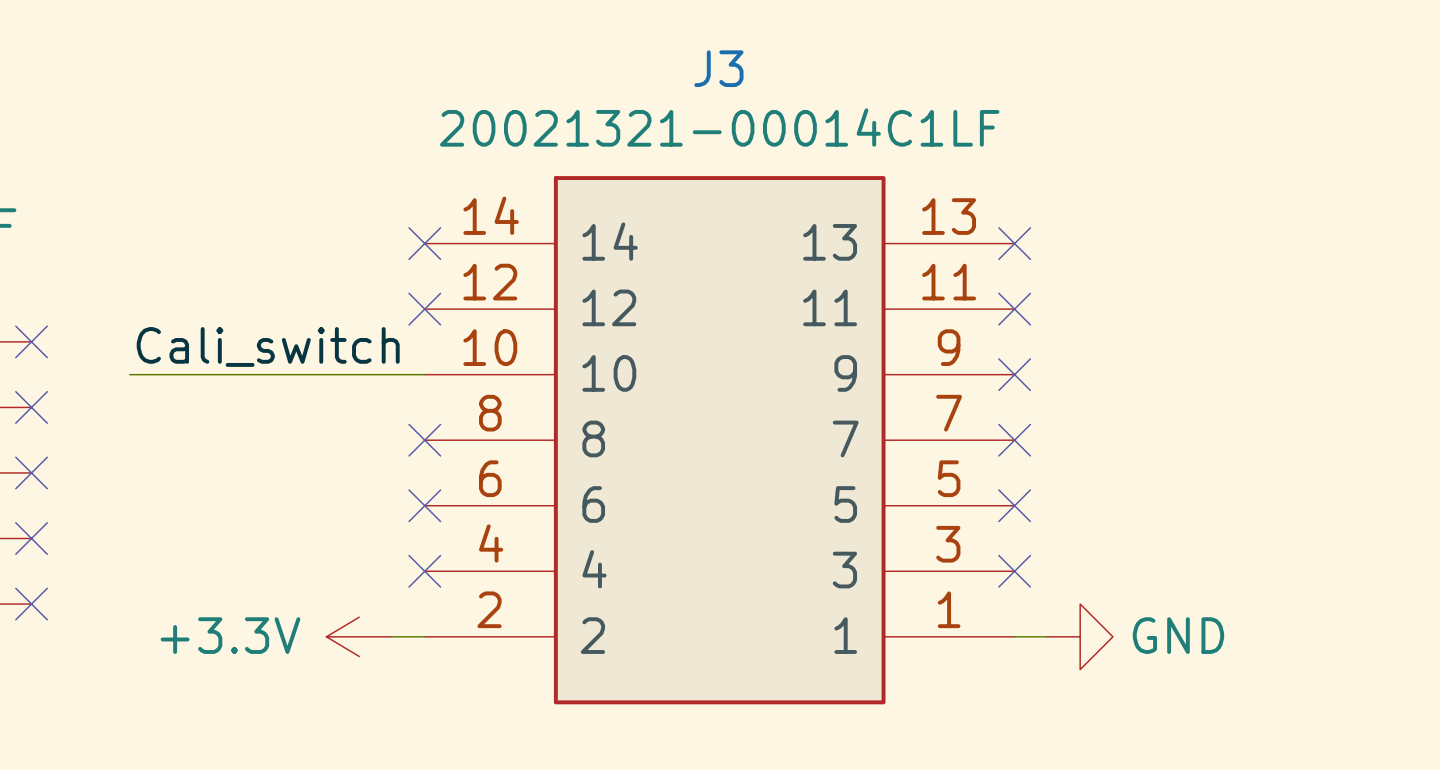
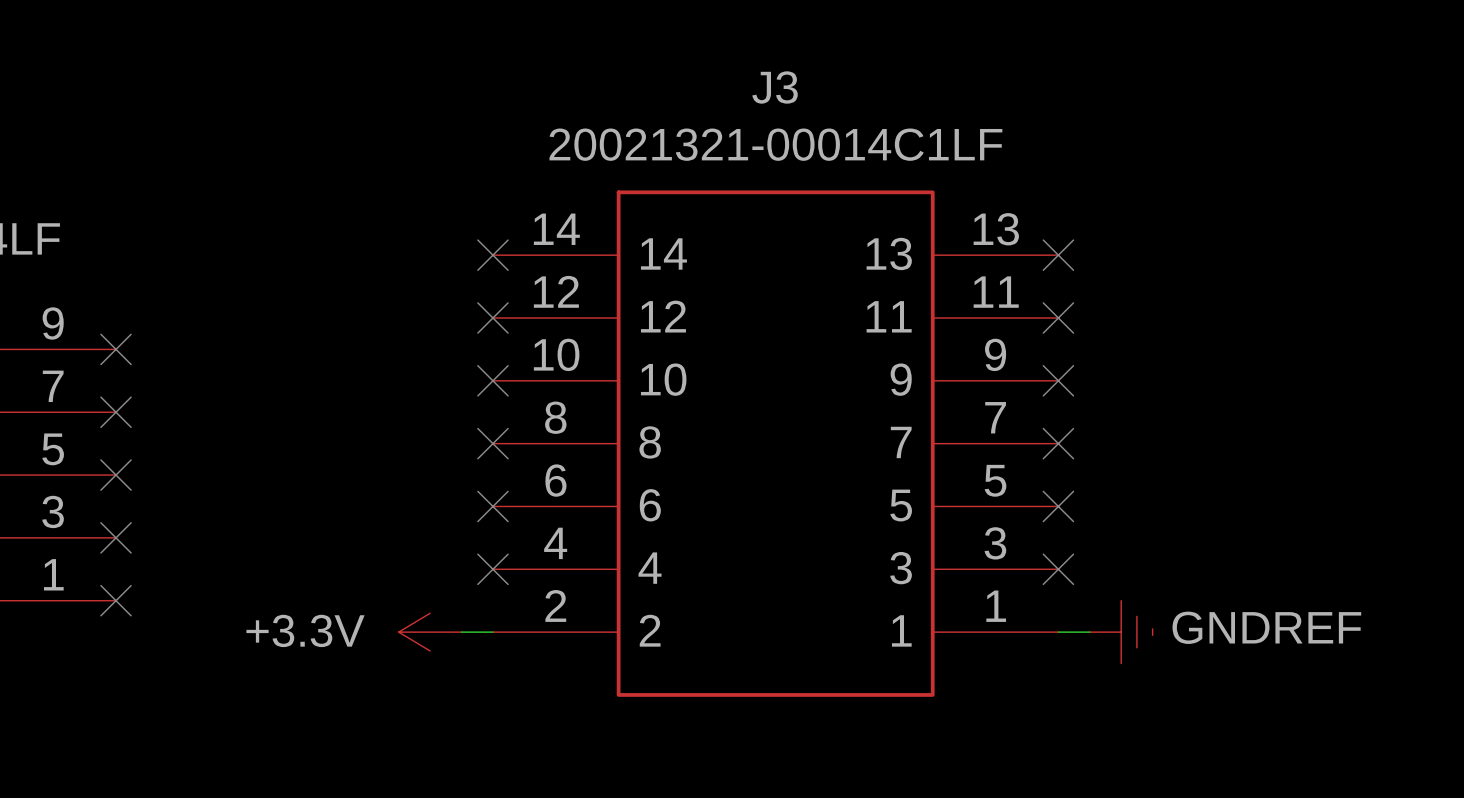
label: Cali_switch (268, 346) -> none
wire: (129, 374) (424, 374) -> none
no-connect mark: none -> (492, 380)
power symbol: GND (1080, 636) -> GNDREF (1121, 632)

